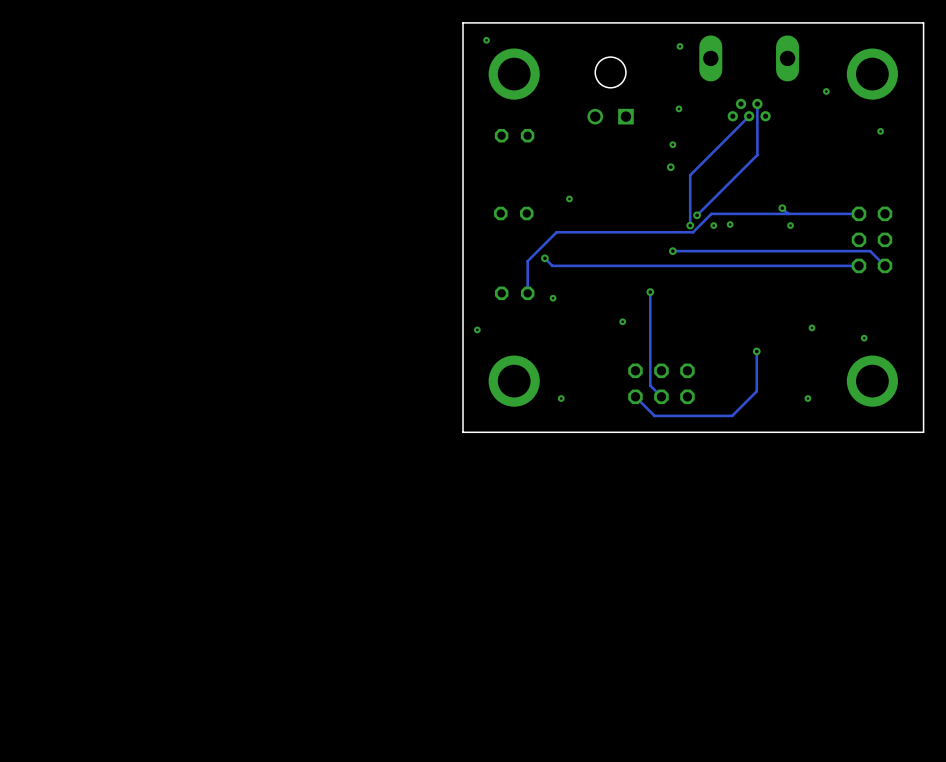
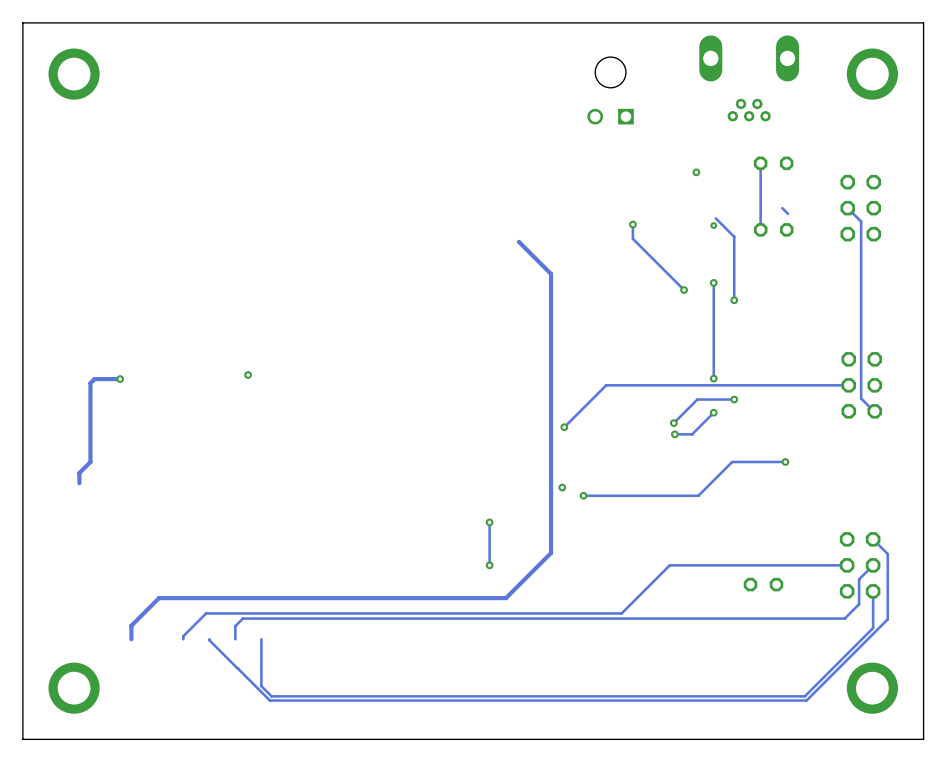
board edge: (463, 22) (463, 432) (923, 432) -> (463, 22) (22, 22) (22, 739) (923, 739) (923, 432)
via: (486, 40) -> none
via: (679, 46) -> none
via: none -> (74, 74)
via: (514, 74) -> none
via: (826, 91) -> none
track: (757, 103) (757, 155) (697, 215) -> none
via: (678, 108) -> none
track: (749, 116) (690, 175) (690, 225) -> none
via: (880, 131) -> none
part: (514, 135) -> none
via: (672, 144) -> none
track: none -> (760, 163) (760, 229)
part: none -> (773, 163)
via: (670, 167) -> none
via: none -> (696, 172)
via: (569, 198) -> none
via: (782, 208) -> none
track: none -> (847, 208) (861, 221) (861, 398) (874, 411)
part: (513, 213) -> none
track: (858, 213) (711, 213) (693, 232) (556, 232) (527, 261) (527, 293) -> none
via: (697, 215) -> none
track: none -> (715, 218) (734, 236) (734, 300)
track: none -> (632, 224) (632, 238) (684, 290)
via: none -> (632, 224)
via: (730, 224) -> none
via: (690, 225) -> none
via: (790, 225) -> none
part: none -> (773, 229)
part position: (871, 239) -> (860, 208)
track: none -> (518, 241) (551, 273) (551, 553) (505, 598) (159, 598) (131, 625) (131, 639)
track: (672, 251) (870, 251) (884, 265) -> none
via: (672, 251) -> none
track: (544, 258) (552, 265) (858, 265) -> none
via: (544, 258) -> none
track: none -> (713, 282) (713, 378)
via: none -> (713, 282)
via: none -> (684, 290)
track: (650, 292) (650, 385) (661, 396) -> none
via: (650, 292) -> none
part: (514, 293) -> none
via: (553, 298) -> none
via: none -> (734, 300)
via: (622, 321) -> none
via: (812, 327) -> none
via: (477, 329) -> none
via: (864, 338) -> none
track: (756, 351) (756, 391) (732, 415) (654, 415) (635, 396) -> none
via: (756, 351) -> none
via: none -> (248, 374)
via: none -> (713, 378)
track: none -> (120, 379) (94, 379) (90, 383) (90, 461) (79, 473) (79, 483)
via: none -> (120, 379)
via: (514, 381) -> none
via: (872, 381) -> none
part: (661, 383) -> none
track: none -> (848, 385) (606, 385) (564, 427)
part: none -> (861, 385)
via: (561, 398) -> none
via: (807, 398) -> none
track: none -> (734, 399) (697, 399) (673, 423)
via: none -> (734, 399)
track: none -> (713, 412) (692, 434) (674, 434)
via: none -> (713, 412)
via: none -> (673, 423)
via: none -> (564, 427)
via: none -> (674, 434)
track: none -> (785, 461) (732, 461) (698, 495) (583, 495)
via: none -> (785, 461)
via: none -> (562, 487)
via: none -> (583, 495)
track: none -> (489, 522) (489, 565)
via: none -> (489, 522)
track: none -> (873, 539) (887, 553) (887, 619) (806, 700) (269, 700) (209, 639)
via: none -> (489, 565)
track: none -> (847, 565) (669, 565) (621, 613) (206, 613) (183, 636) (183, 639)
part: none -> (860, 565)
track: none -> (873, 565) (859, 579) (859, 604) (844, 618) (242, 618) (235, 626) (235, 639)
part: none -> (763, 584)
track: none -> (873, 591) (873, 628) (804, 696) (271, 696) (261, 686) (261, 639)
via: none -> (74, 688)
via: none -> (872, 688)

